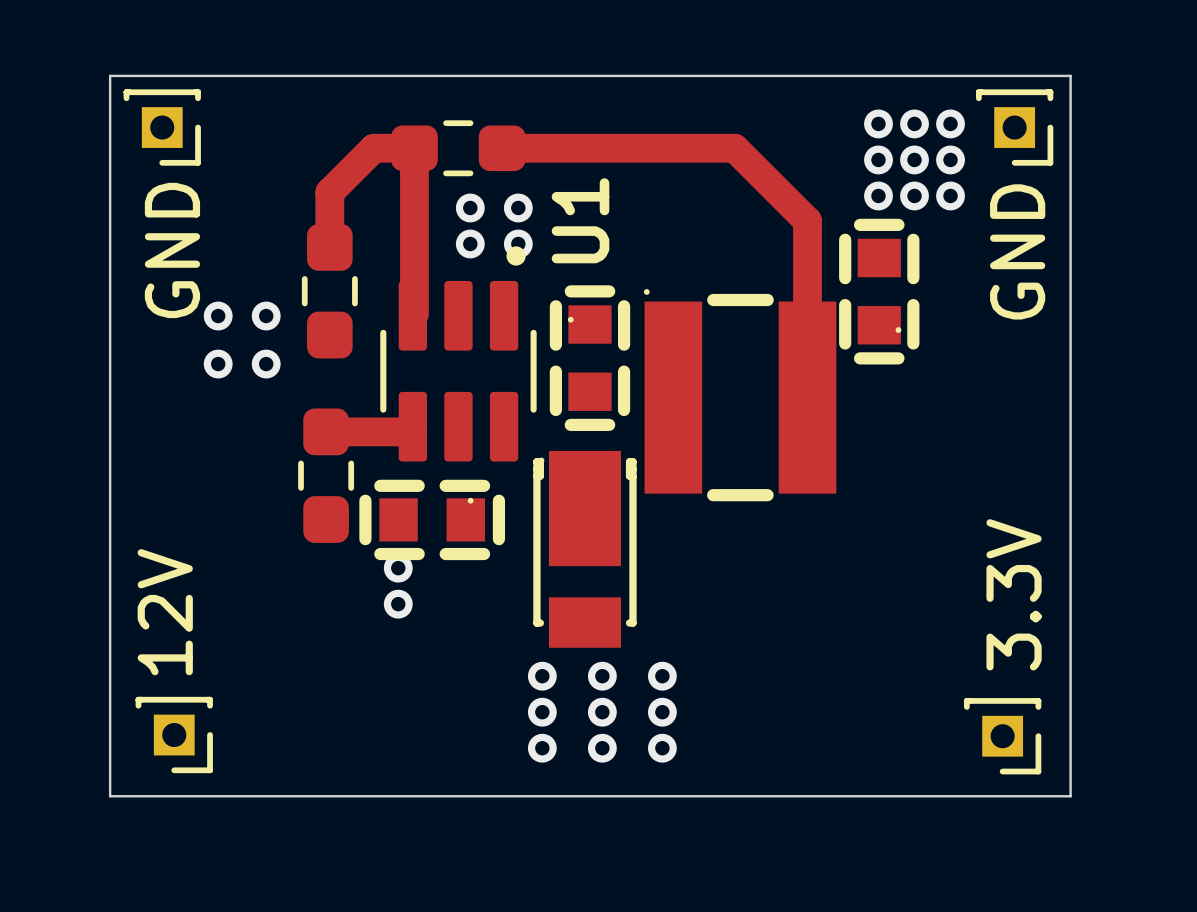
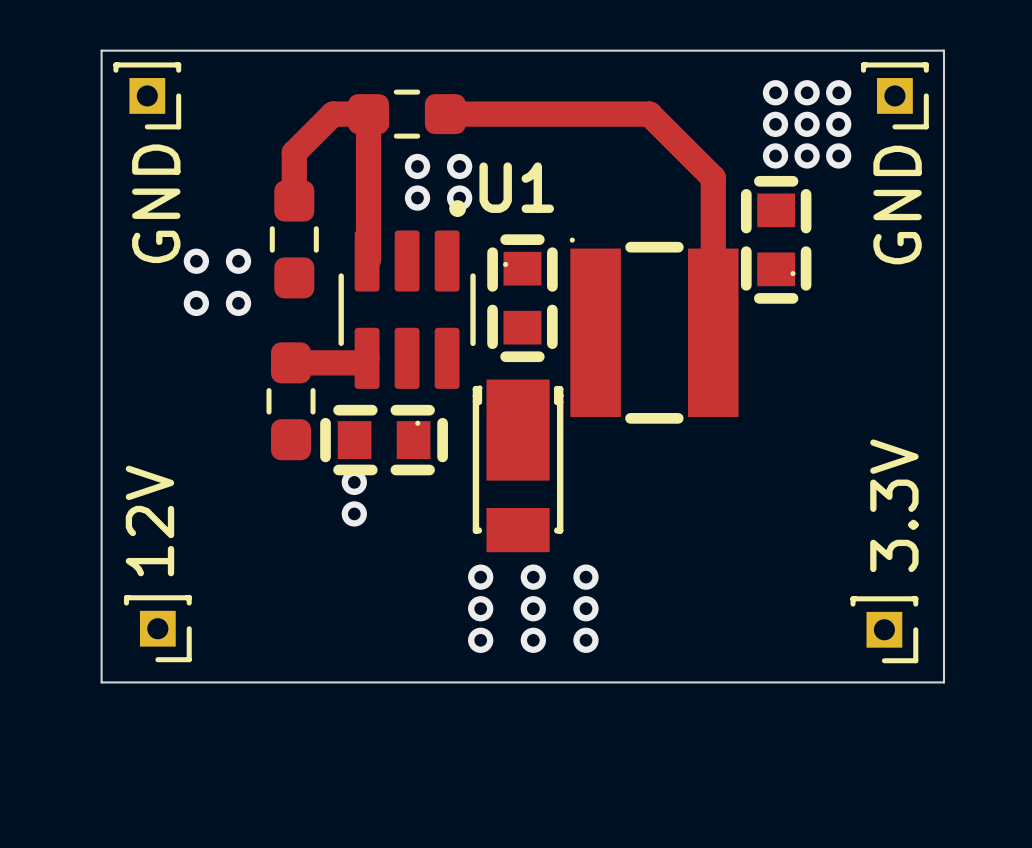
U1 name rotation: 0° (580, 220) -> 90° clockwise (516, 187)

